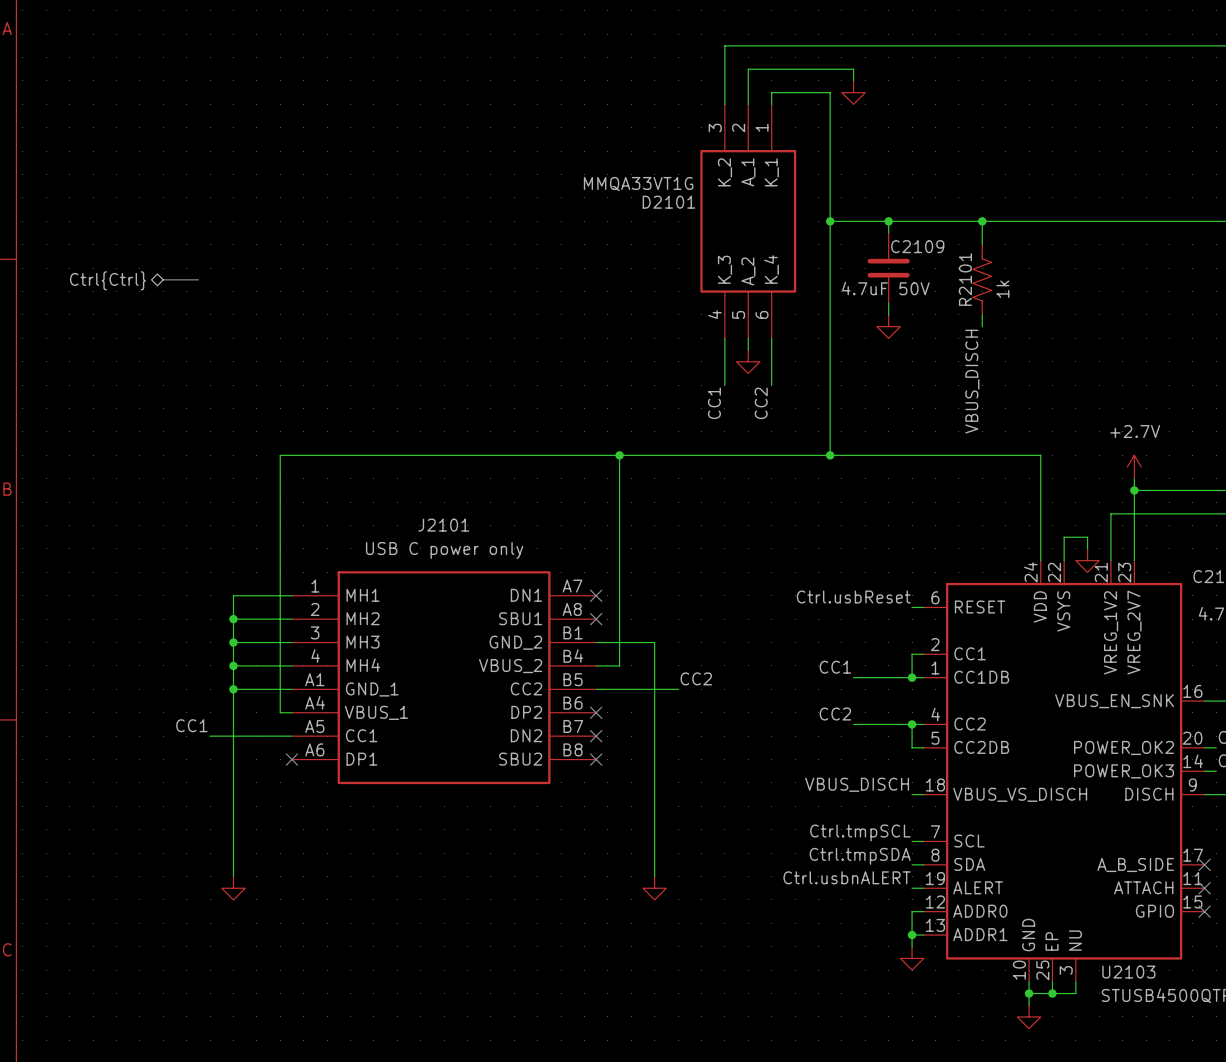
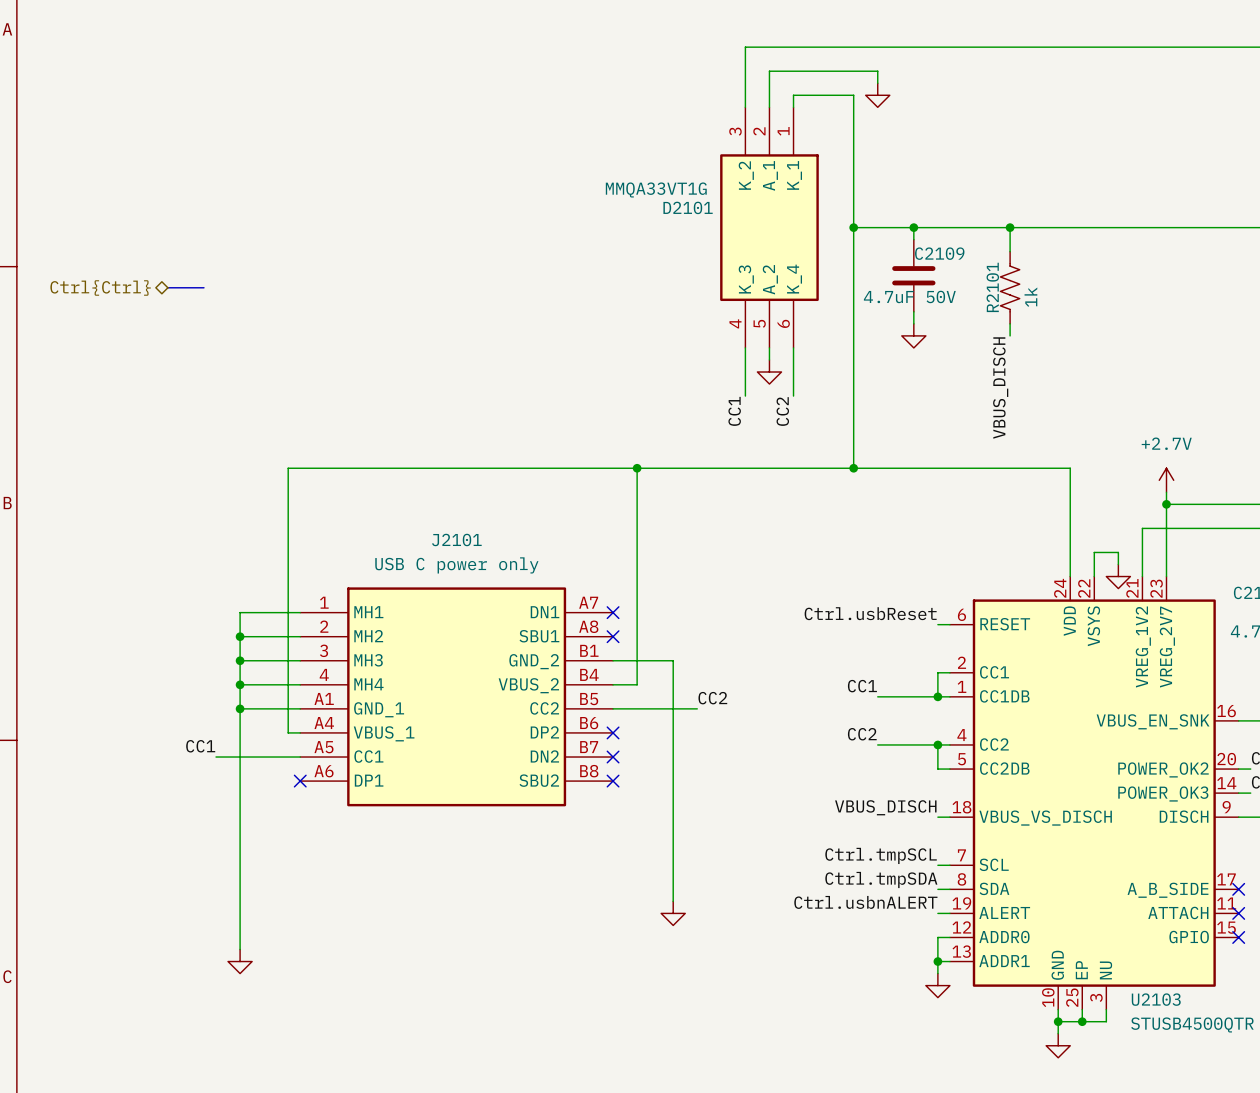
wire: none -> (240, 901) (240, 949)
power symbol position: (233, 888) -> (240, 961)

